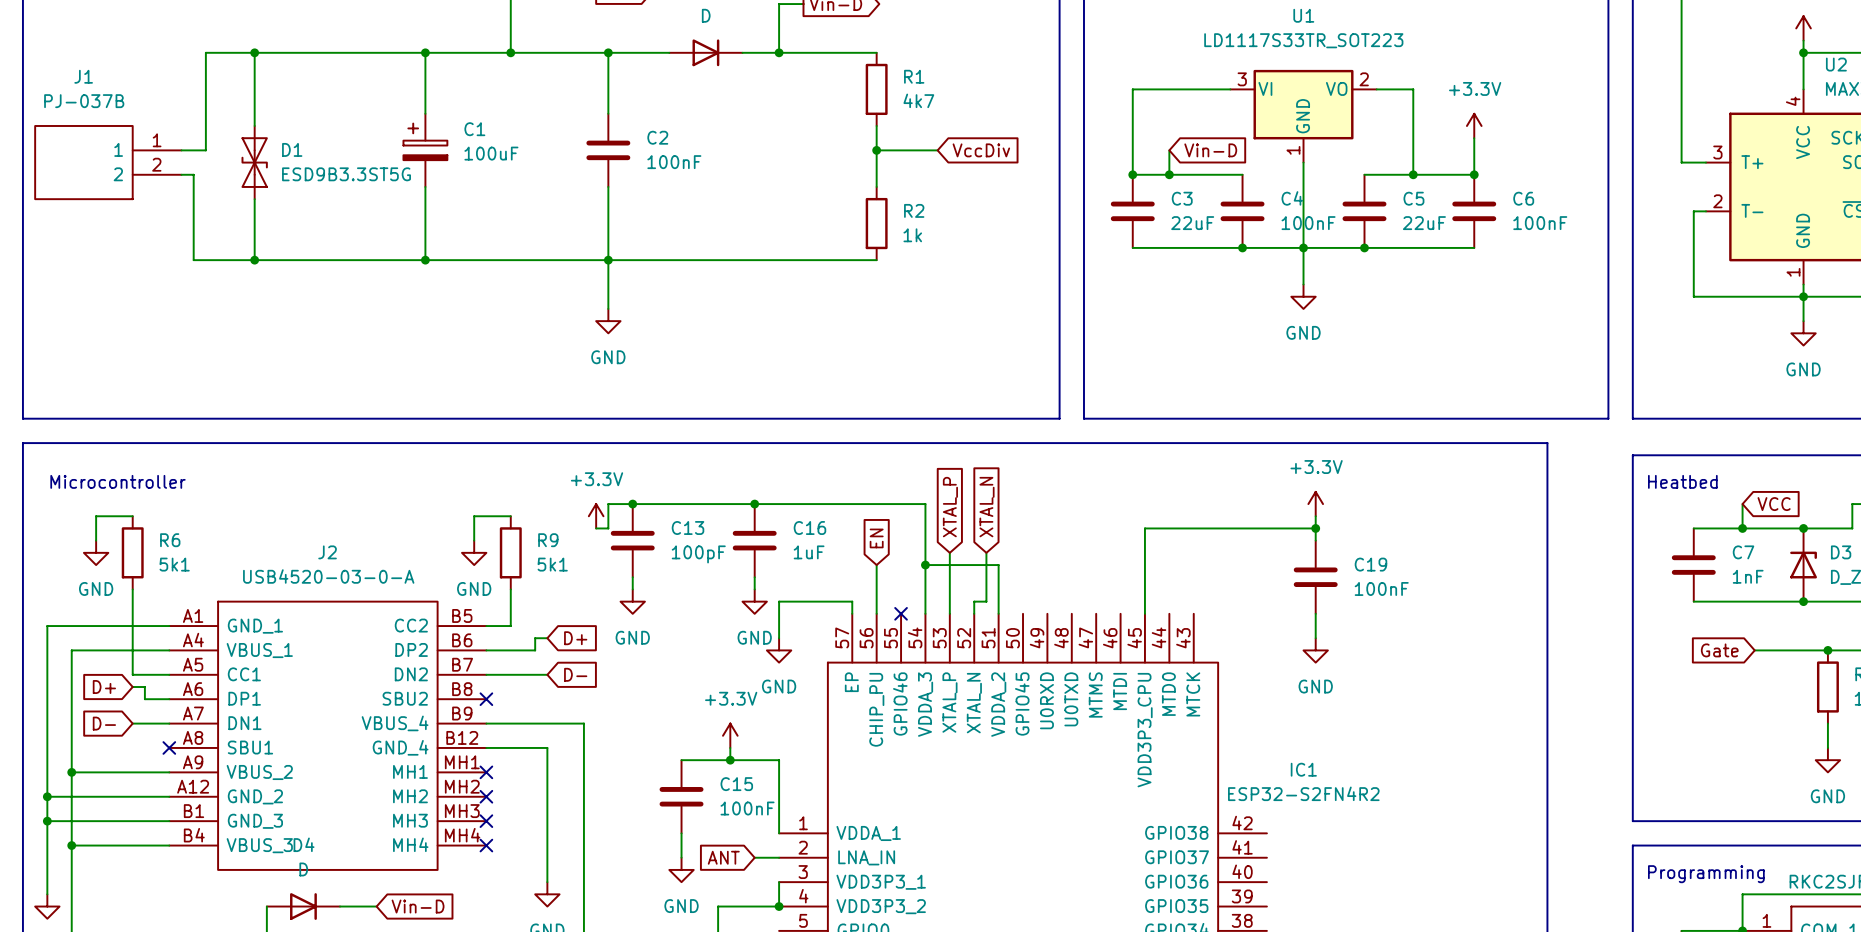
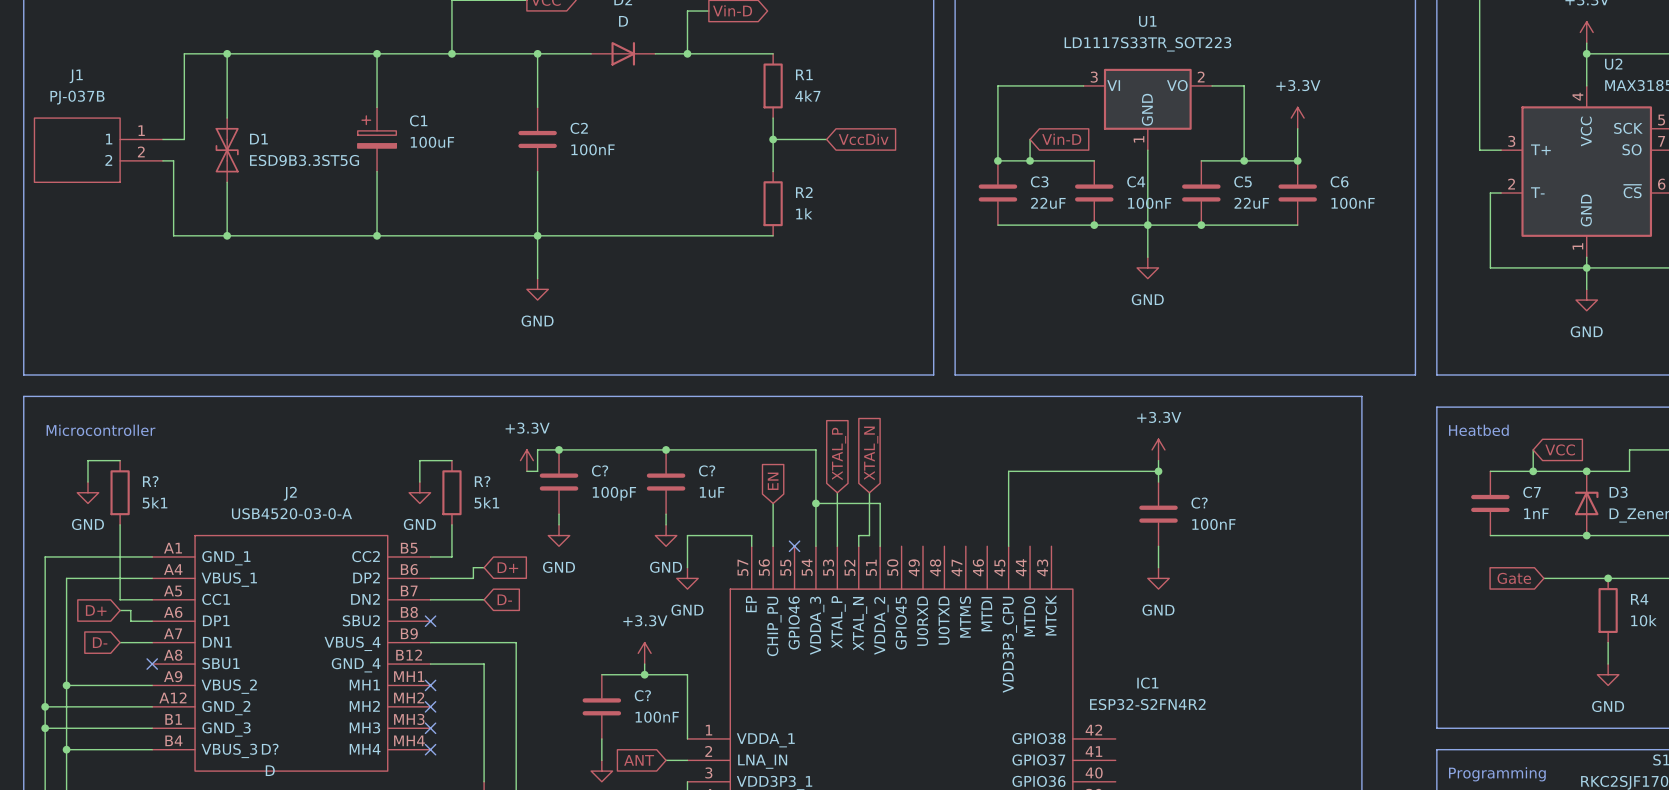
C13 name: C13 (688, 528) -> C? (600, 470)
C16 name: C16 (809, 528) -> C? (707, 470)
R6 name: R6 (170, 540) -> R? (150, 481)
R9 name: R9 (548, 540) -> R? (482, 481)
C19 name: C19 (1370, 564) -> C? (1199, 503)
C15 name: C15 (736, 784) -> C? (642, 695)
D4 name: D4 (304, 844) -> D? (270, 749)

